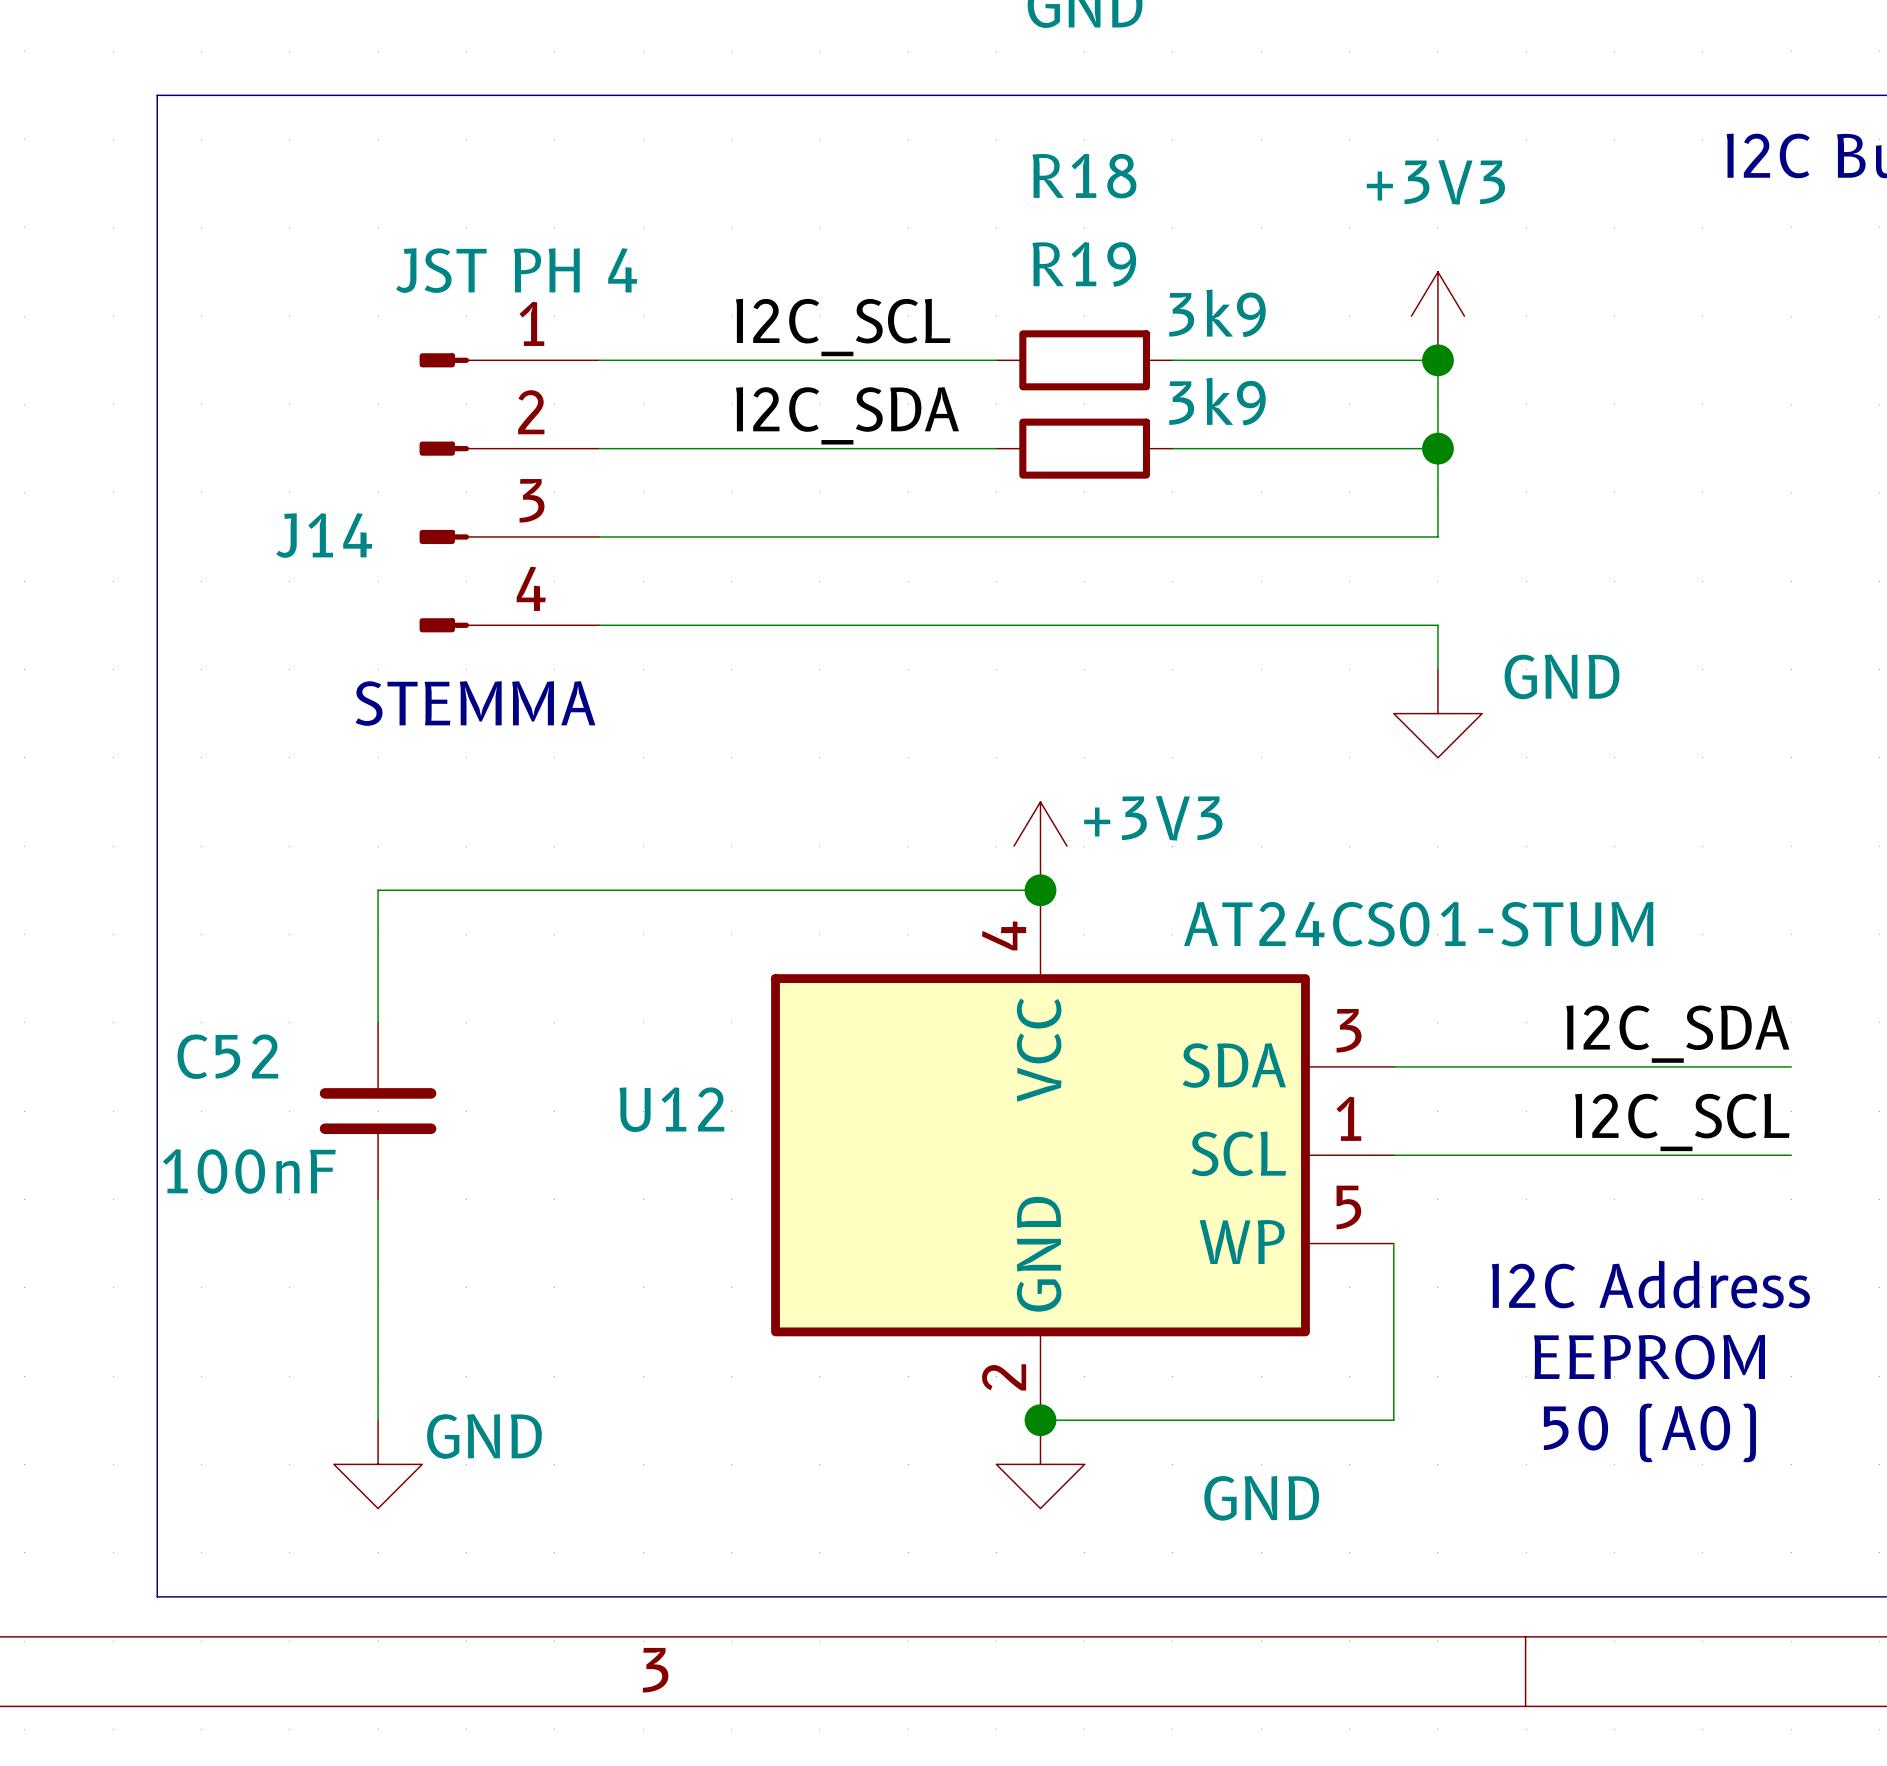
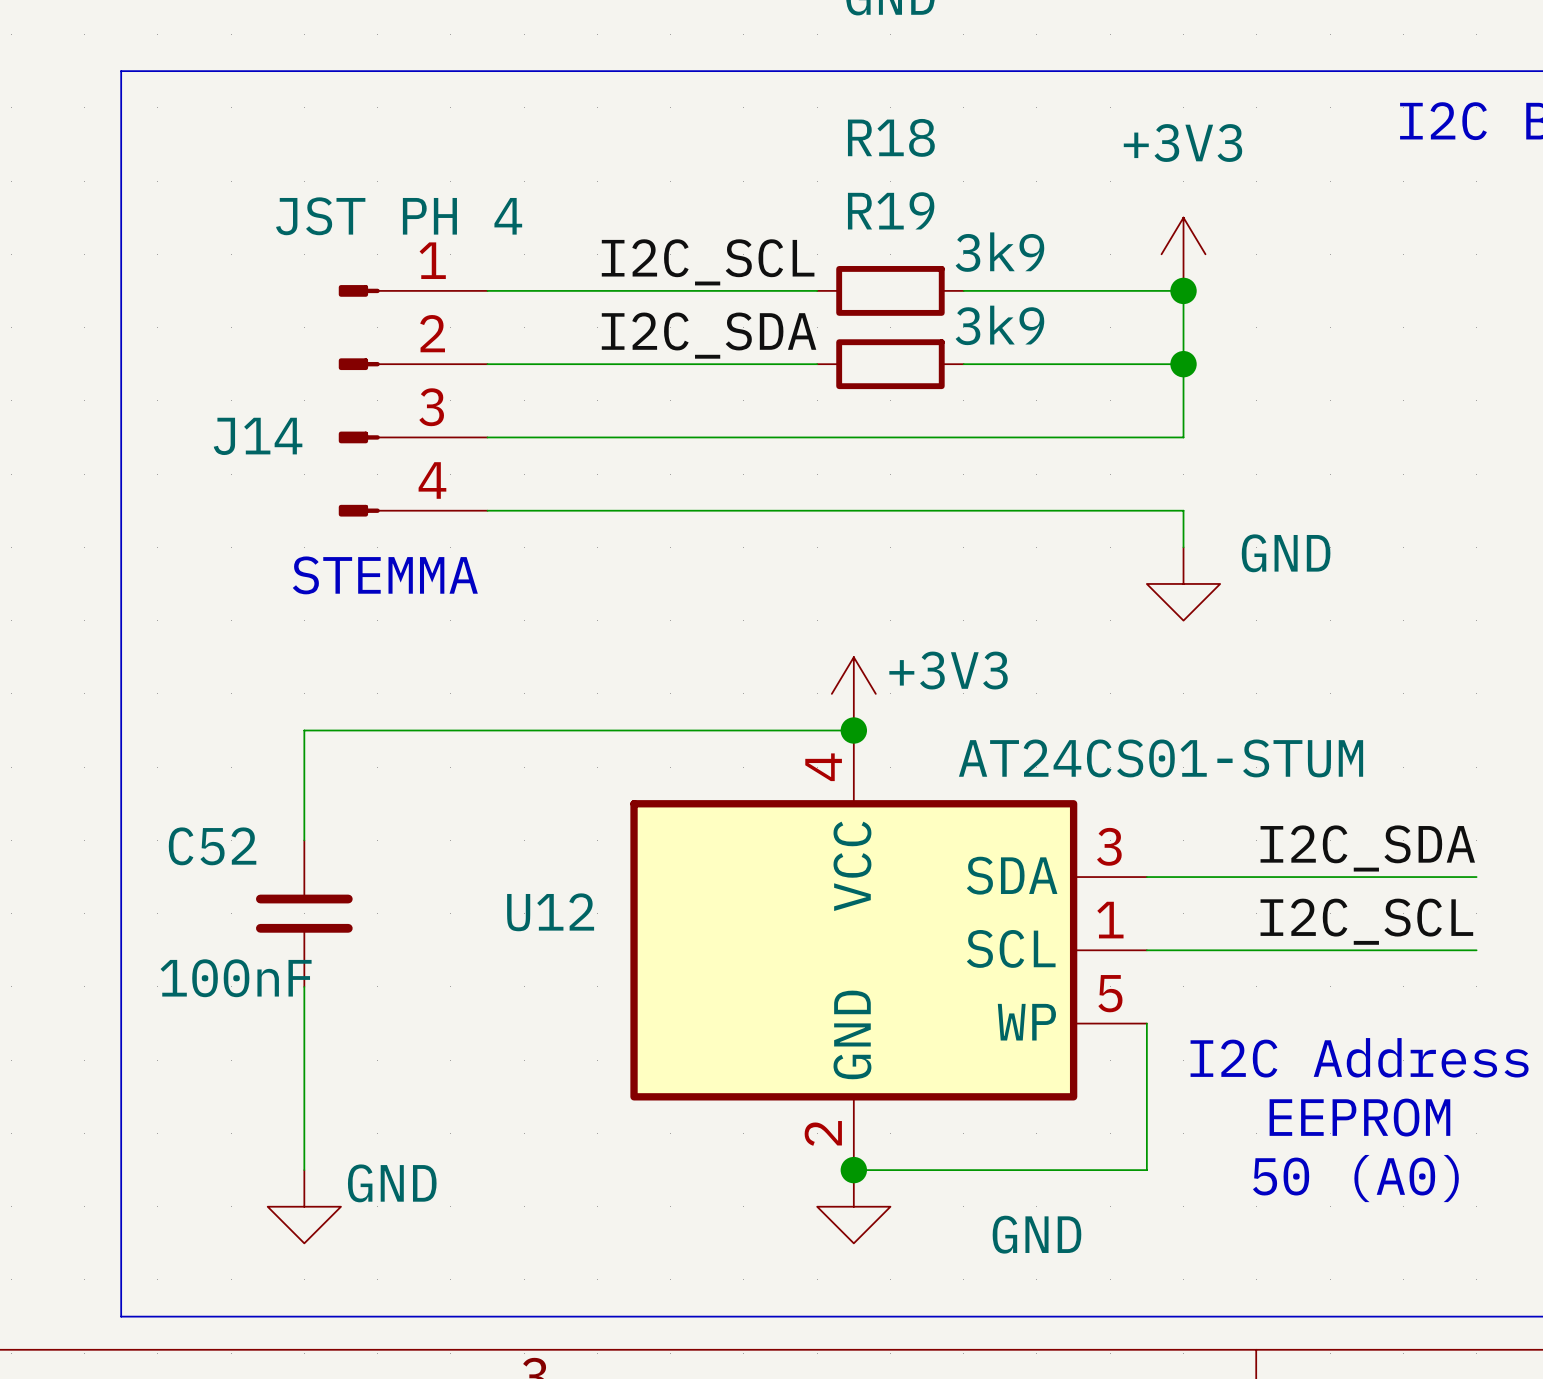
C52 name position: C52 (227, 1056) -> C52 (212, 846)
C52 value position: 100nF (249, 1171) -> 100nF (236, 978)

